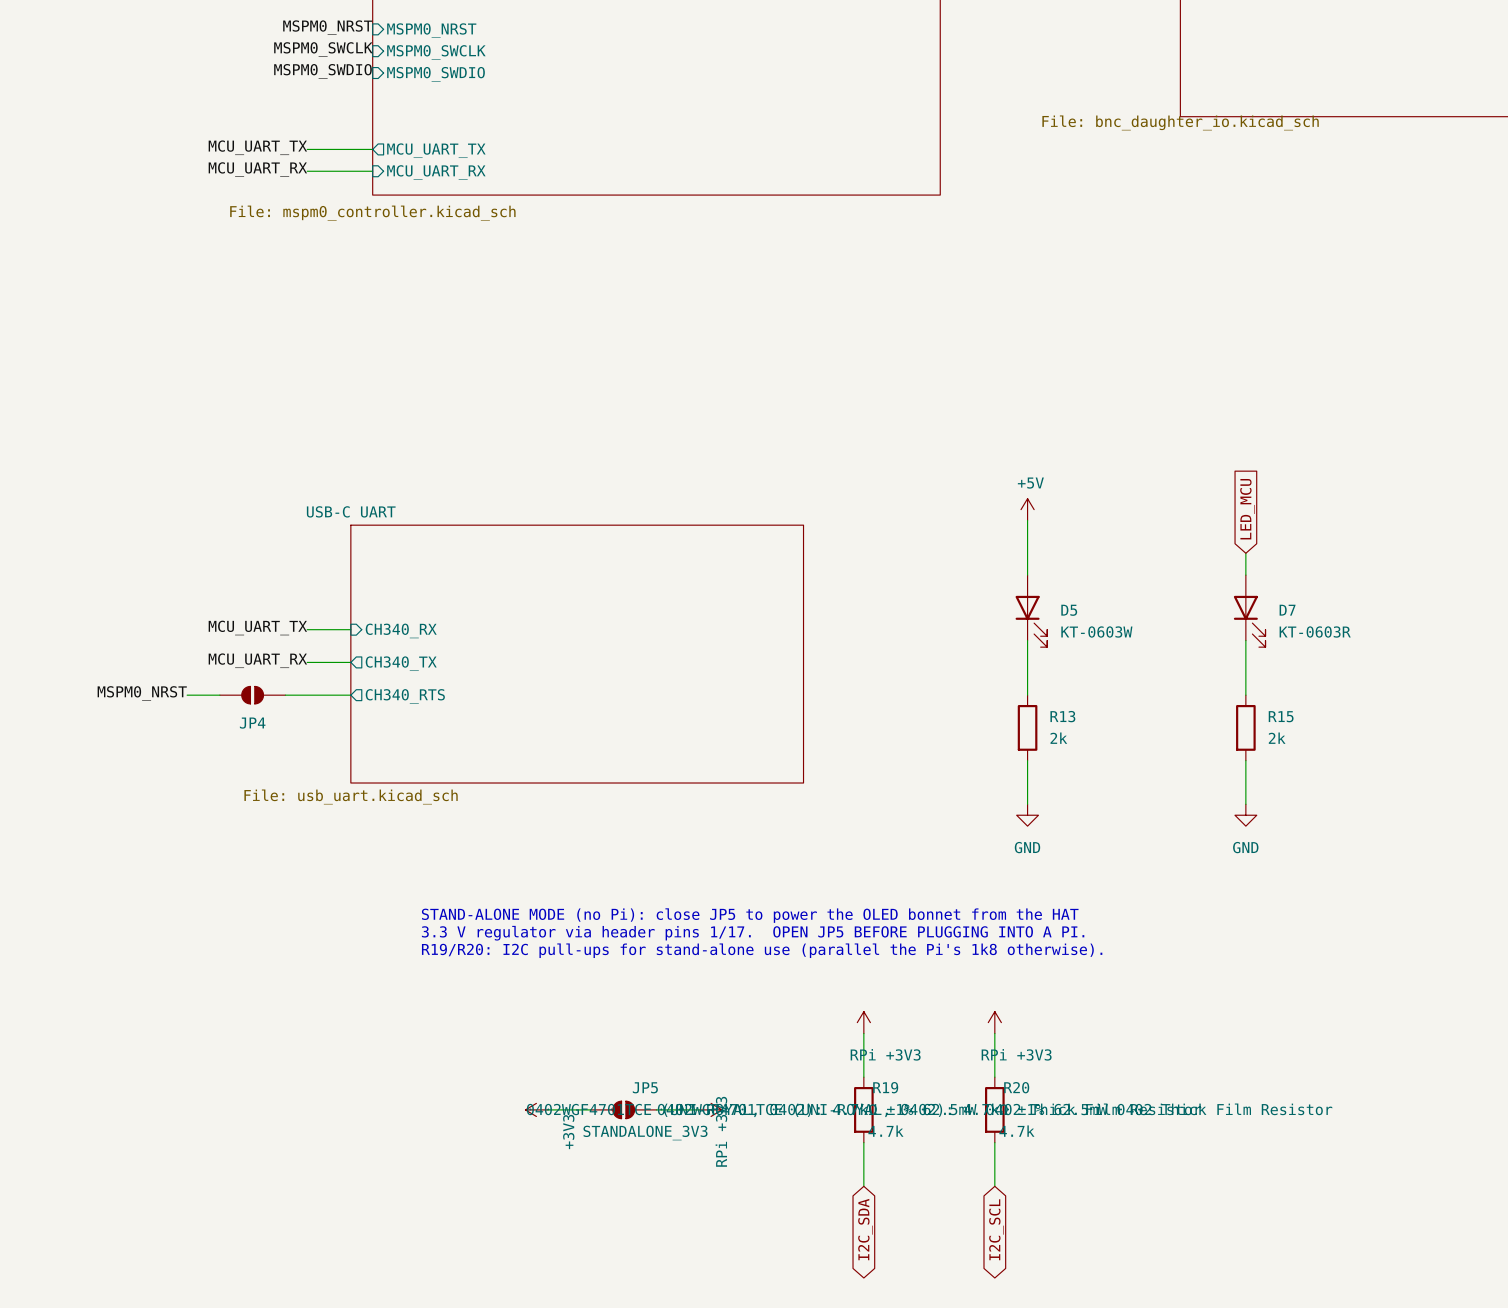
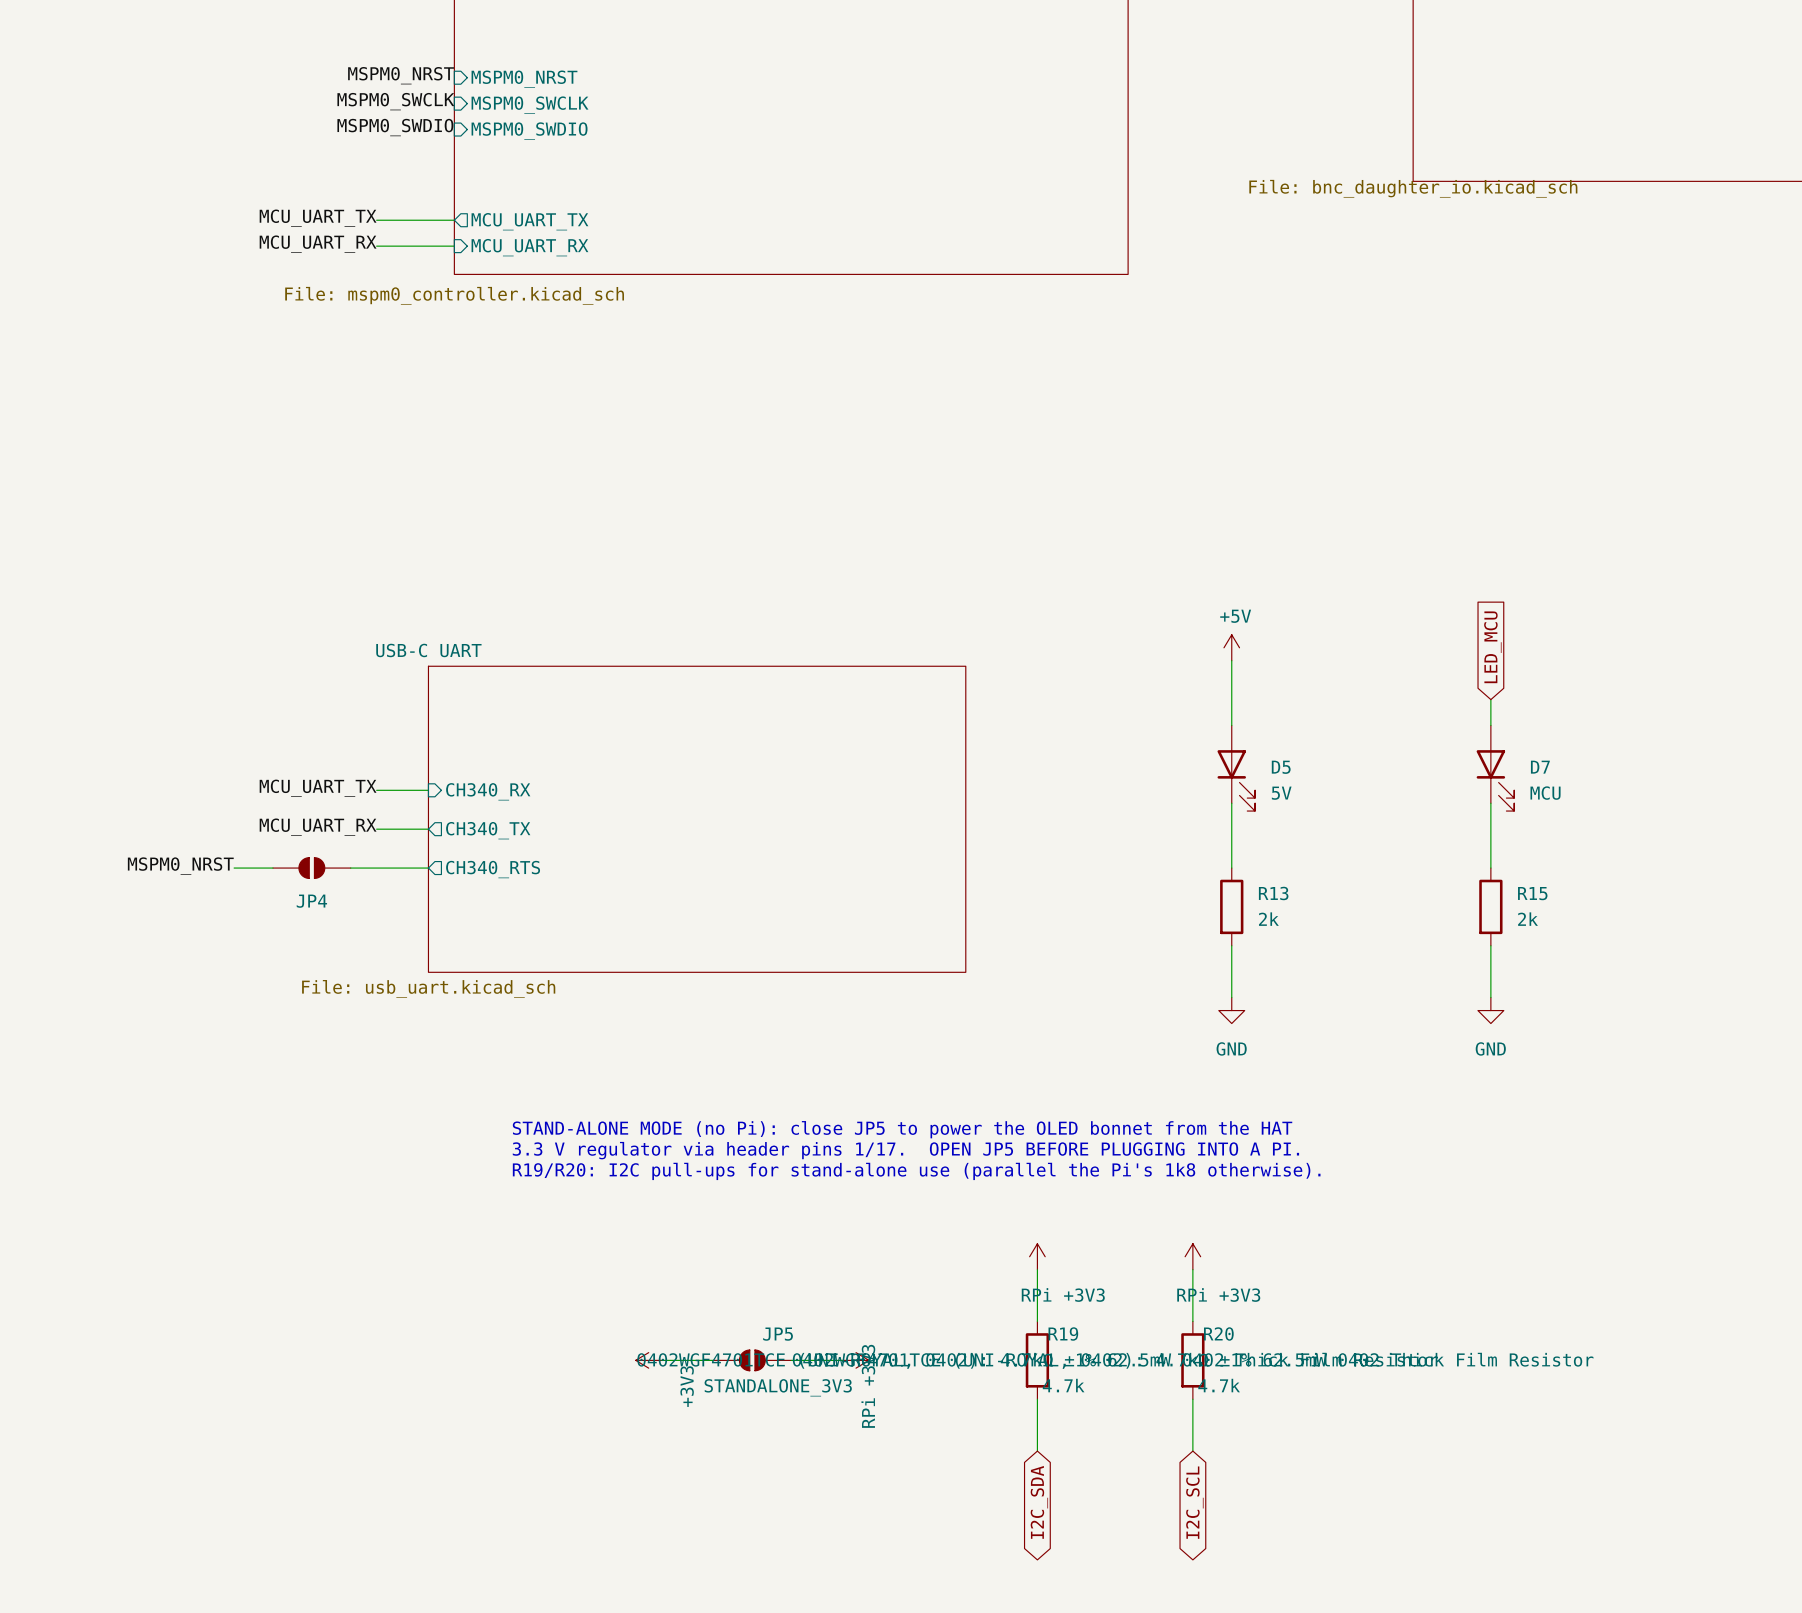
D5 value: KT-0603W (1096, 632) -> 5V (1281, 793)
D7 value: KT-0603R (1315, 632) -> MCU (1545, 793)

